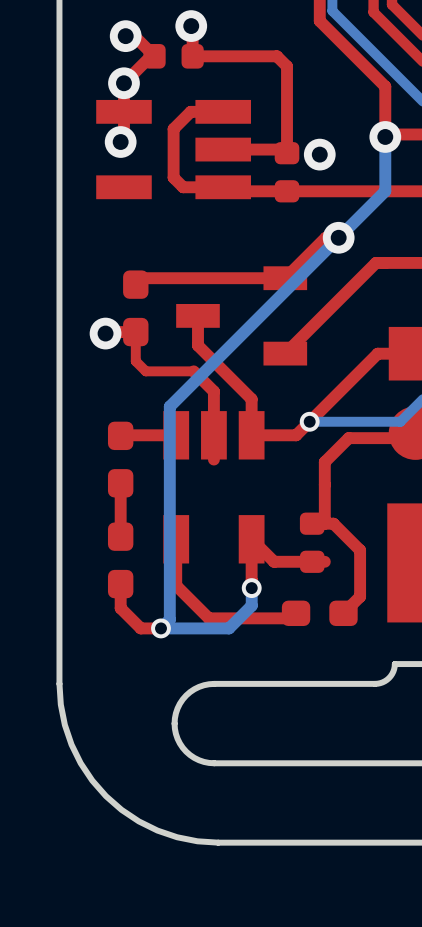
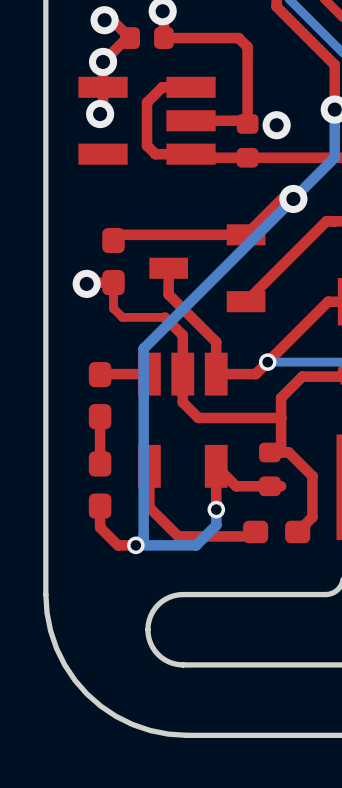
top track: none -> (182, 395) (182, 402) (198, 417) (281, 417)

